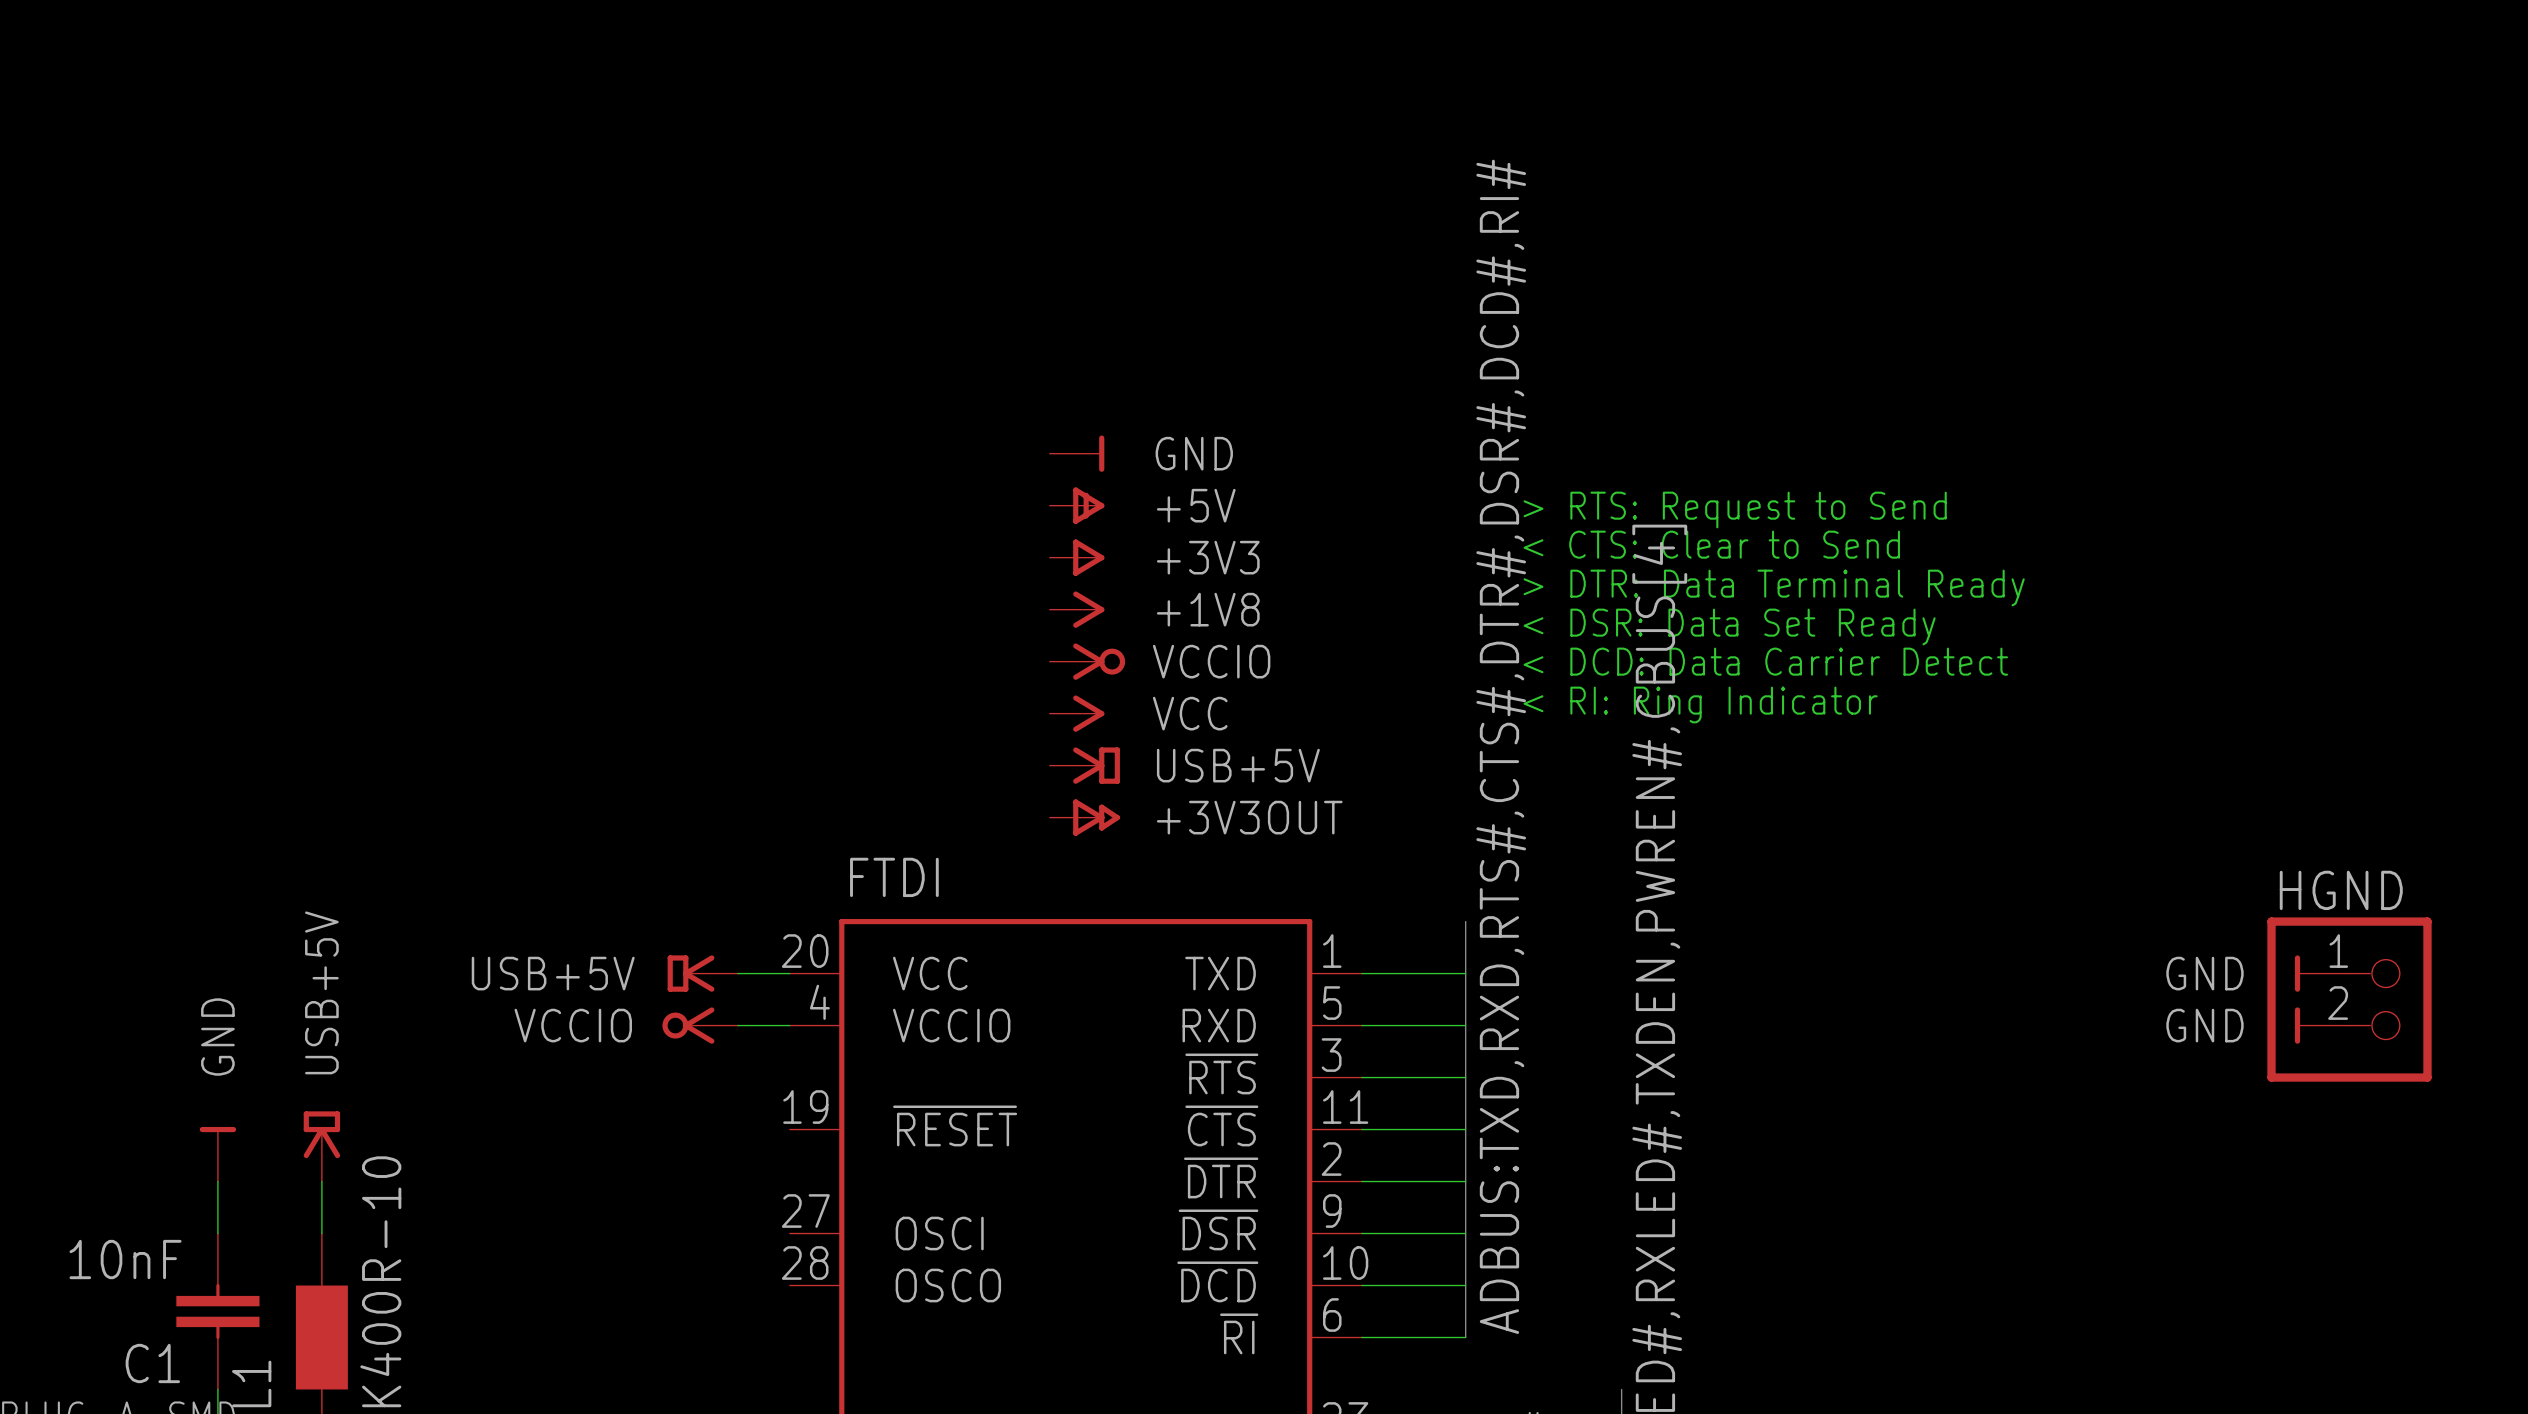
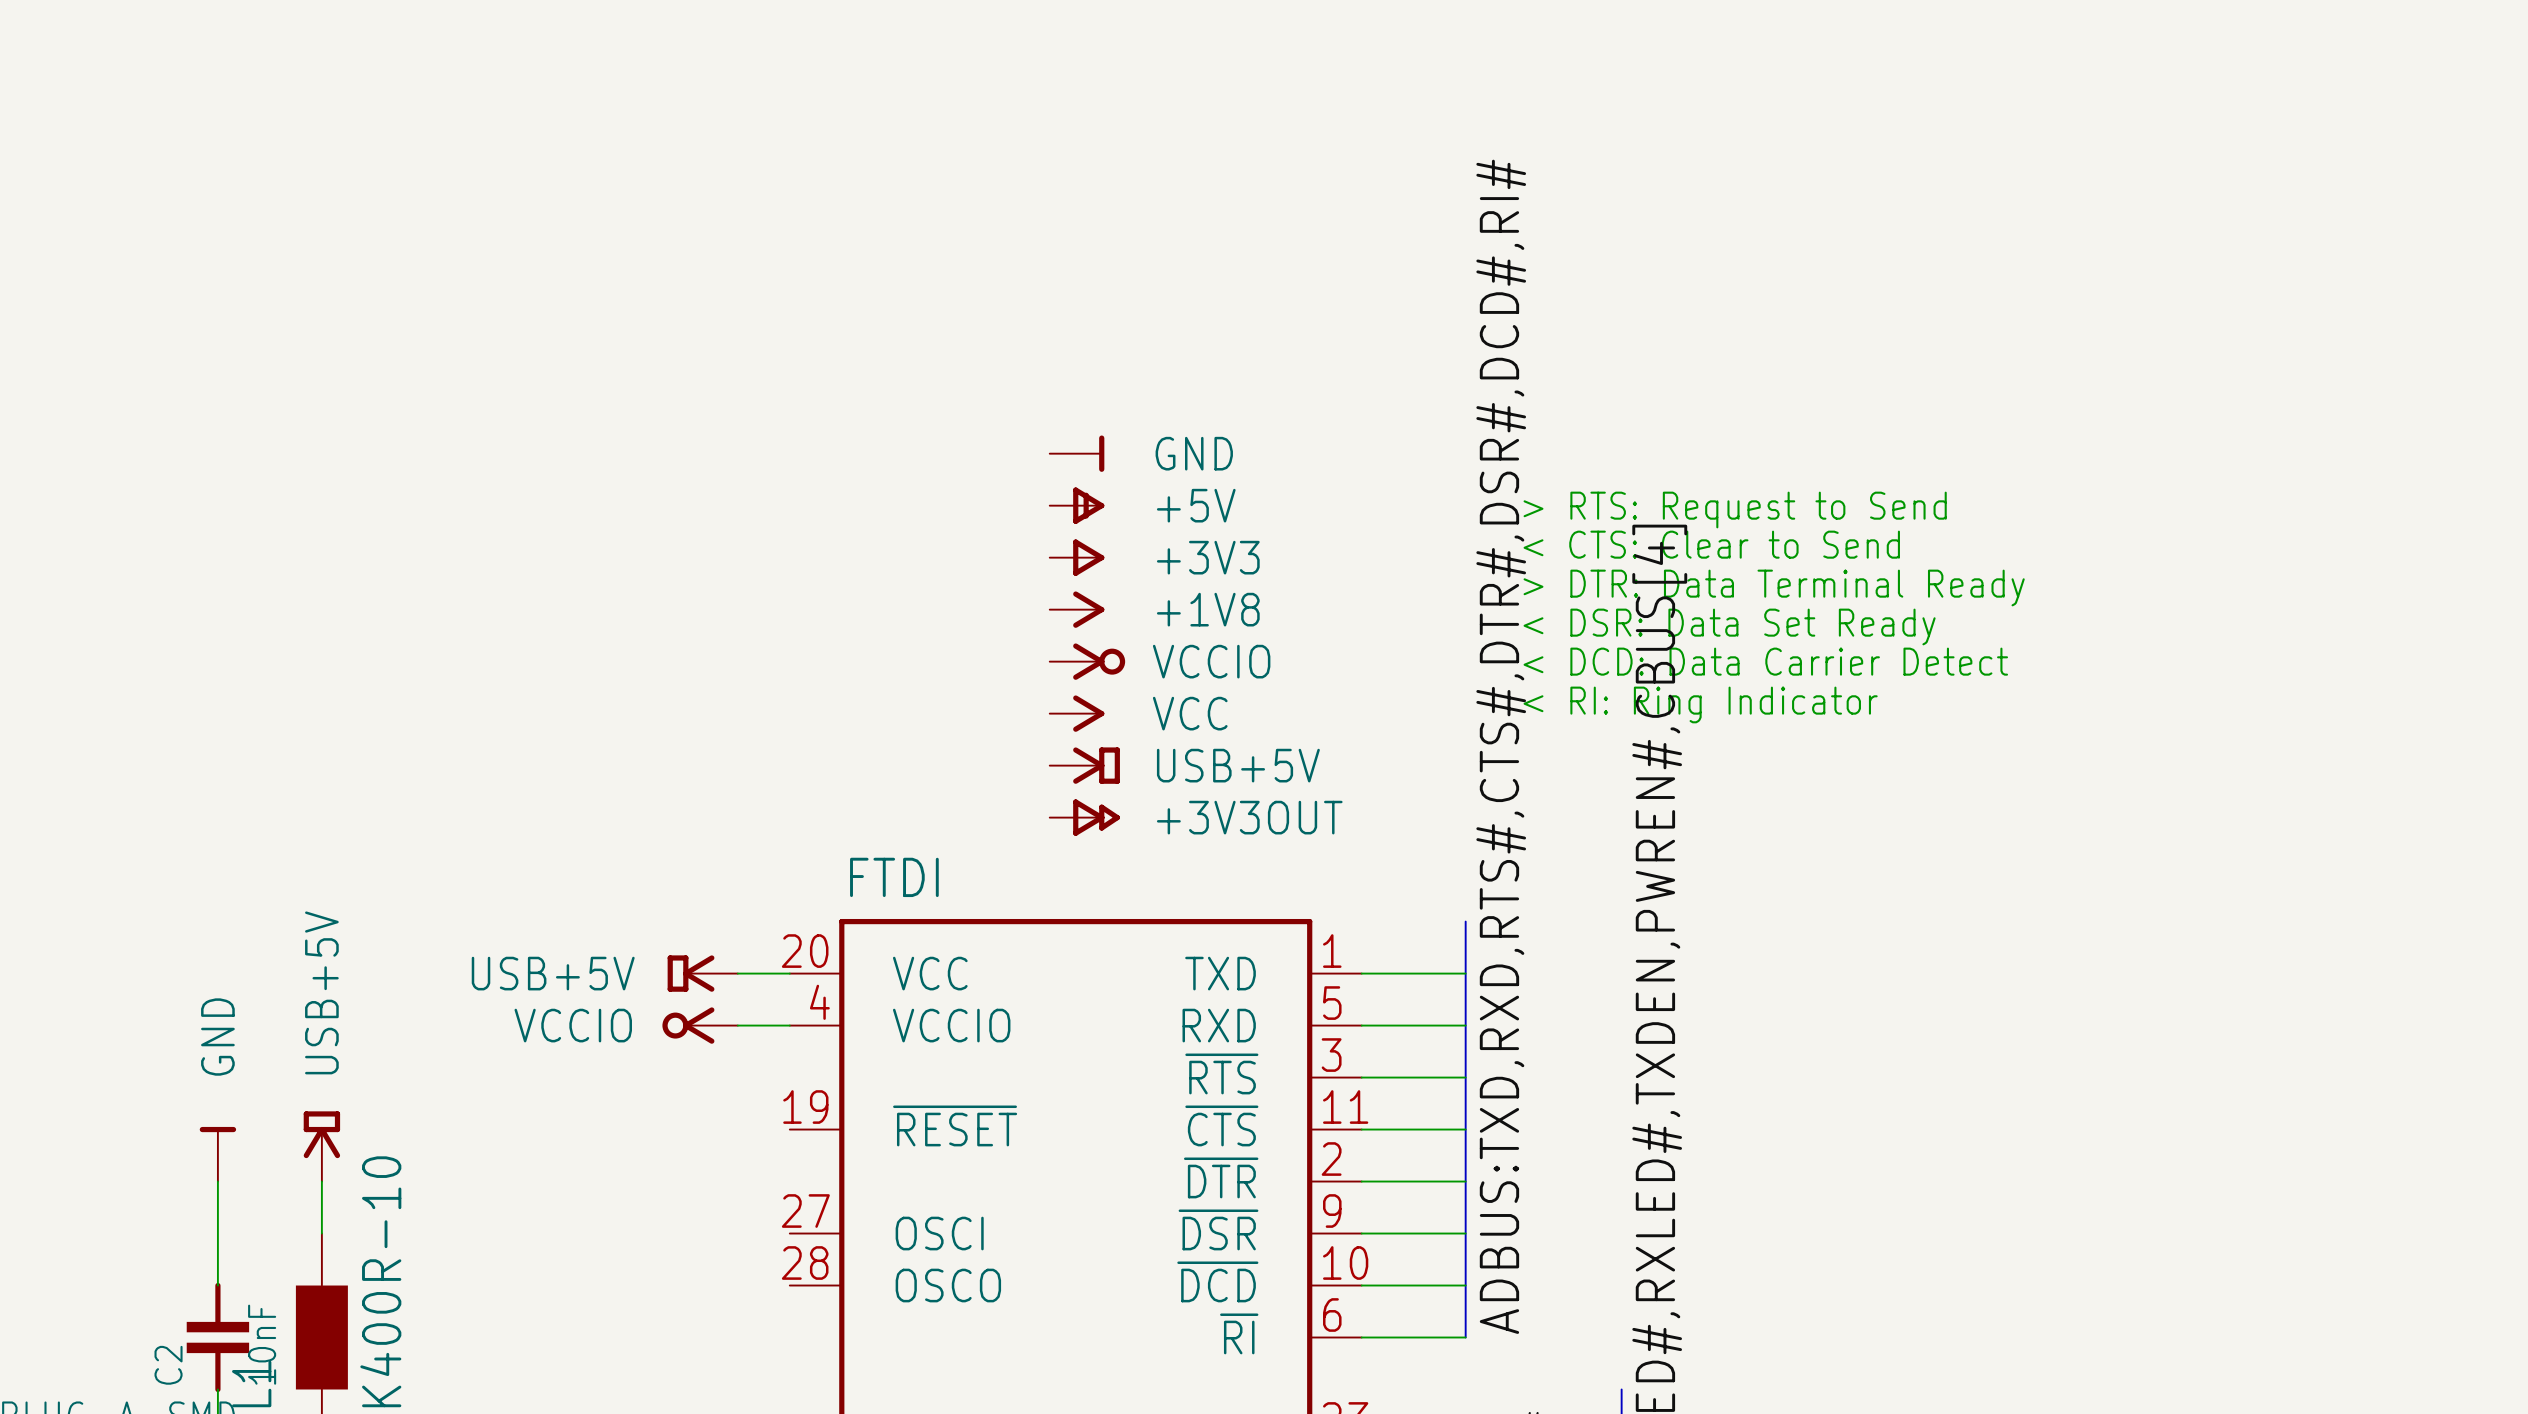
power symbol: (2322, 973) -> none
HGND: (2349, 999) -> none
power symbol: (2322, 1025) -> none
C1: 10nF (217, 1311) -> none
C2: none -> 10nF (217, 1337)

